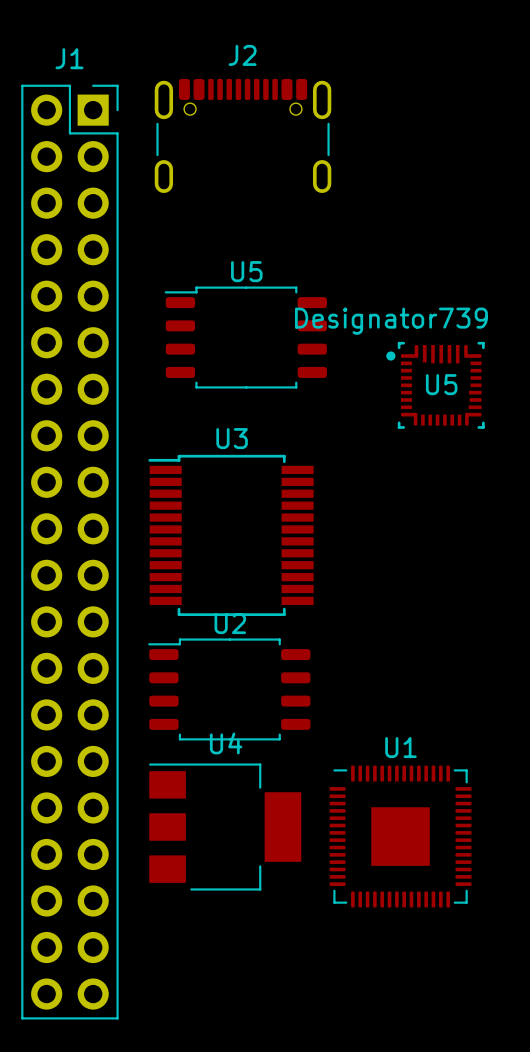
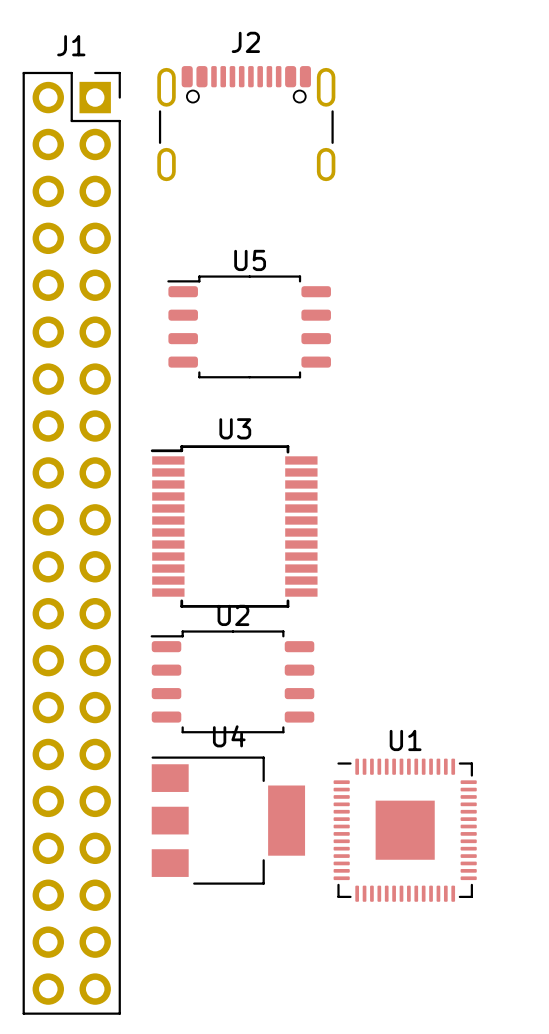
U5: (435, 385) -> none

